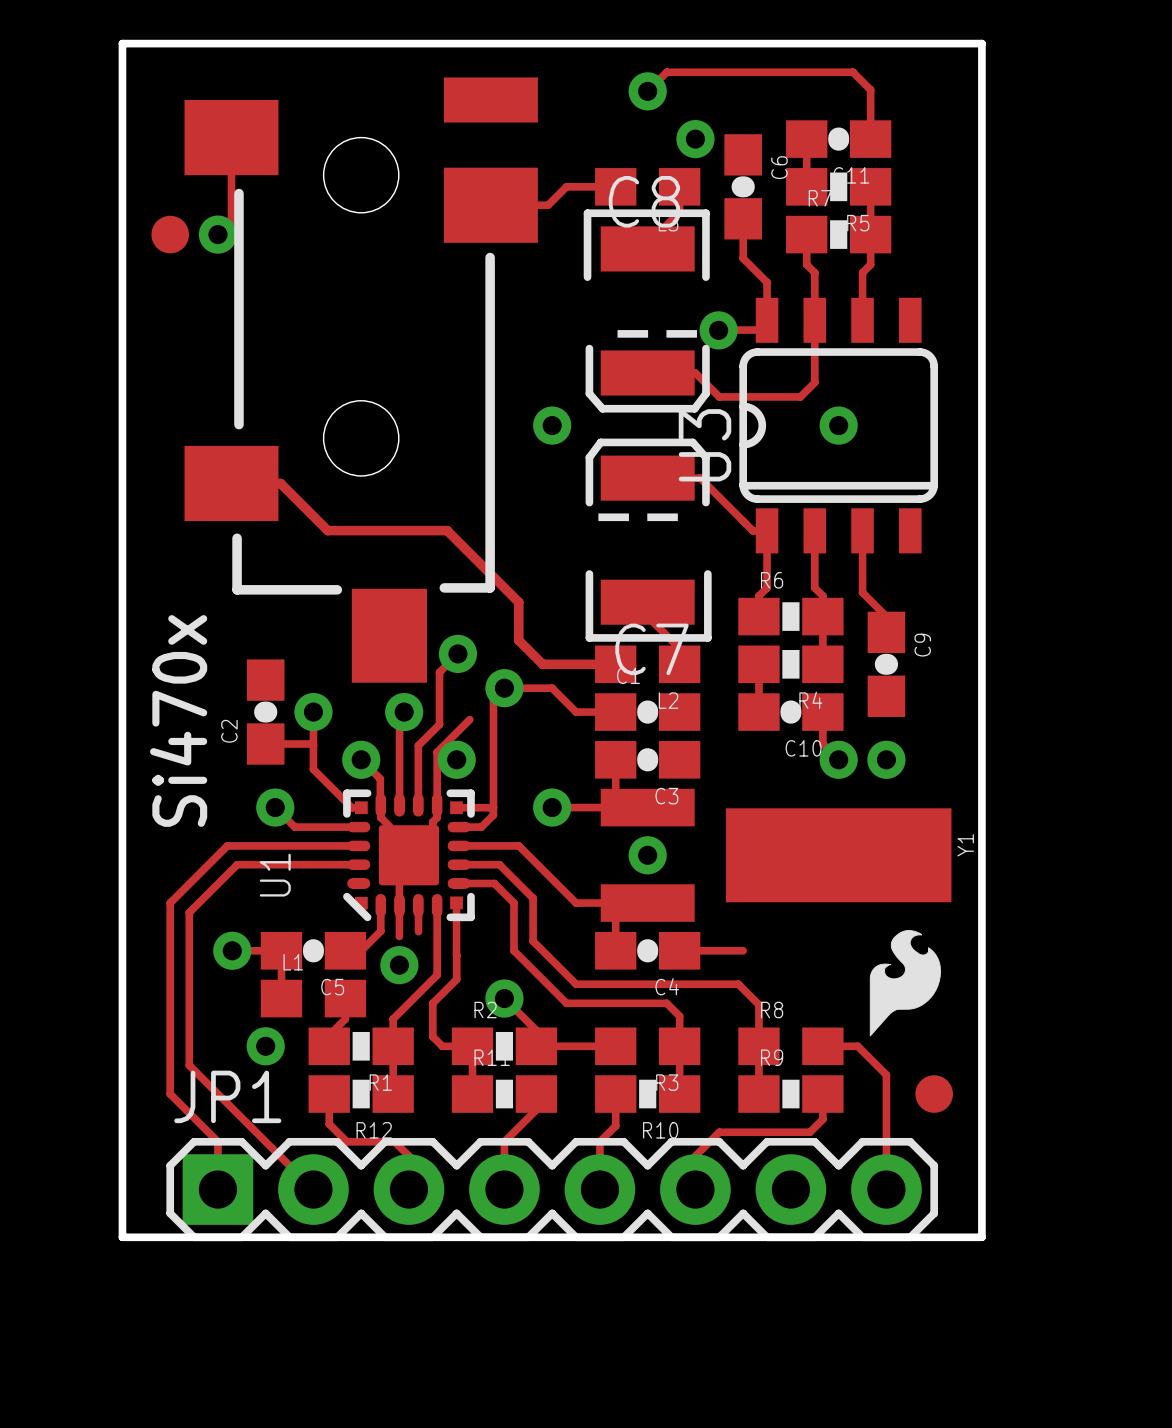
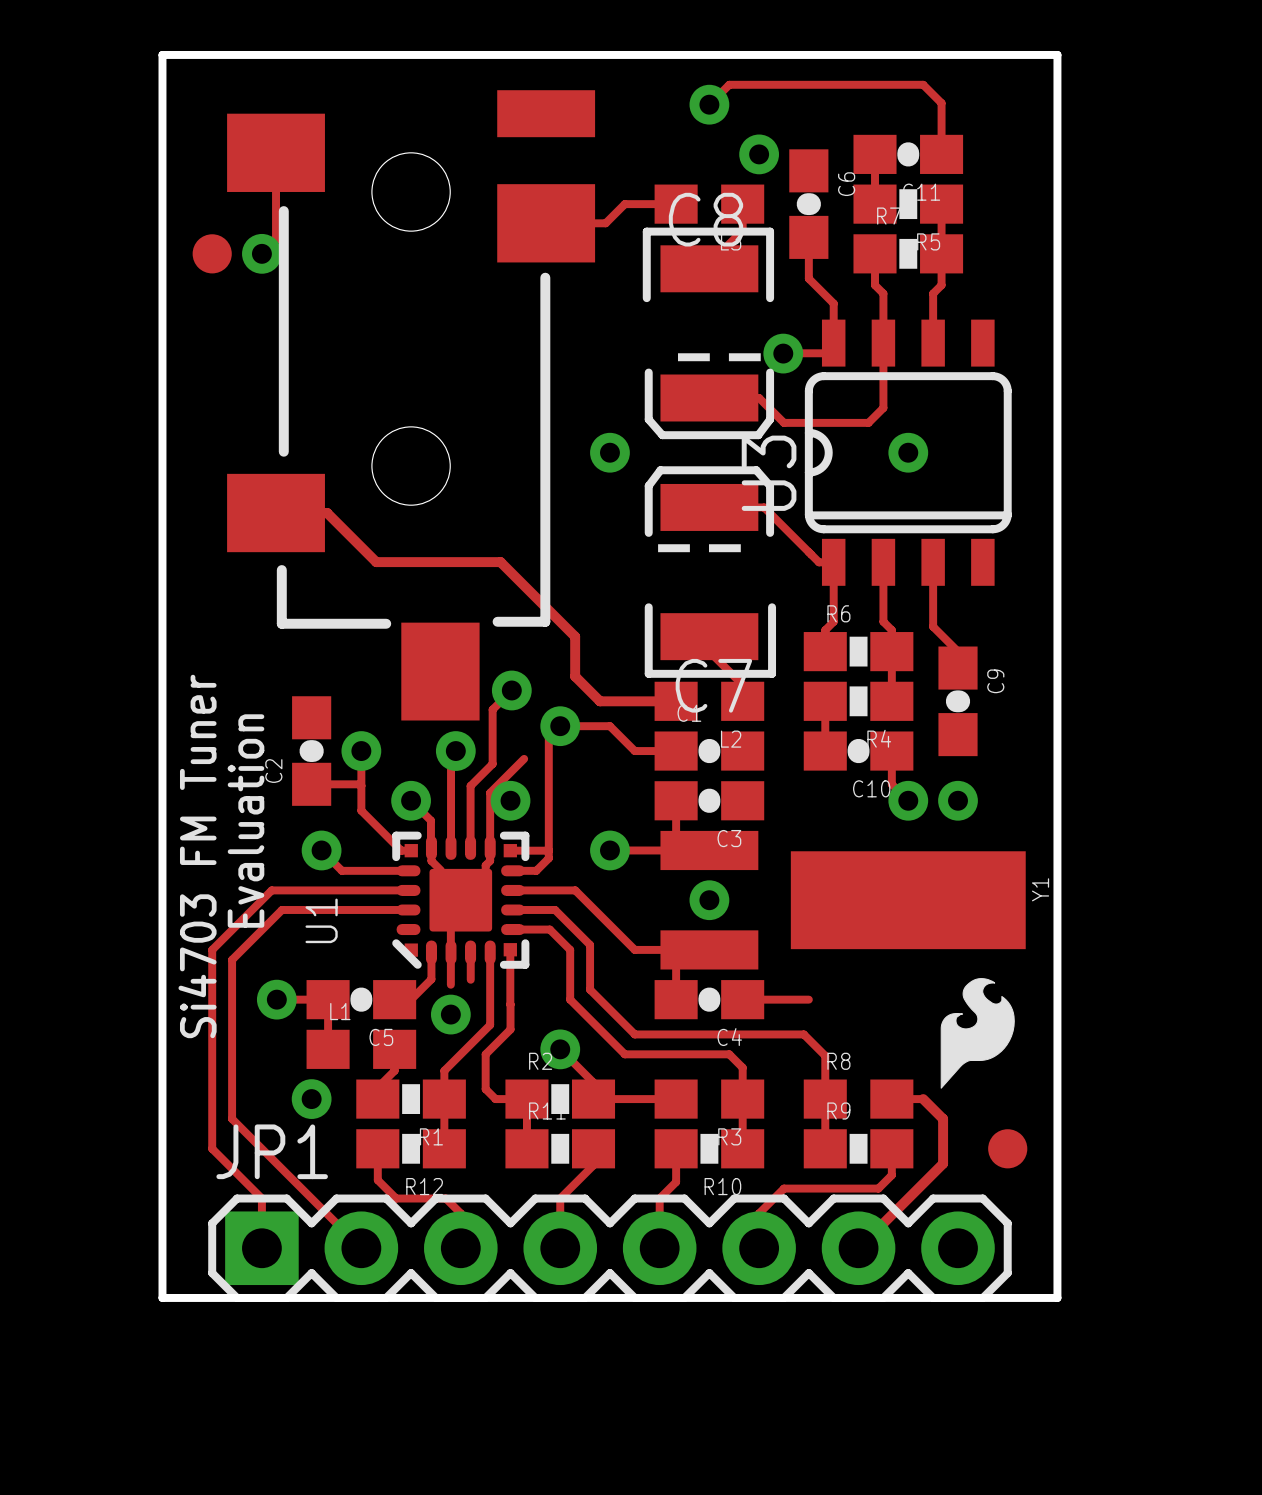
text: Si470x (178, 720) -> none
text: none -> Evaluation (246, 821)
text: none -> Si4703 FM Tuner (197, 856)
track: (853, 1046) (857, 1046) (886, 1074) (886, 1189) -> (923, 1099) (943, 1118) (943, 1163) (858, 1248)

